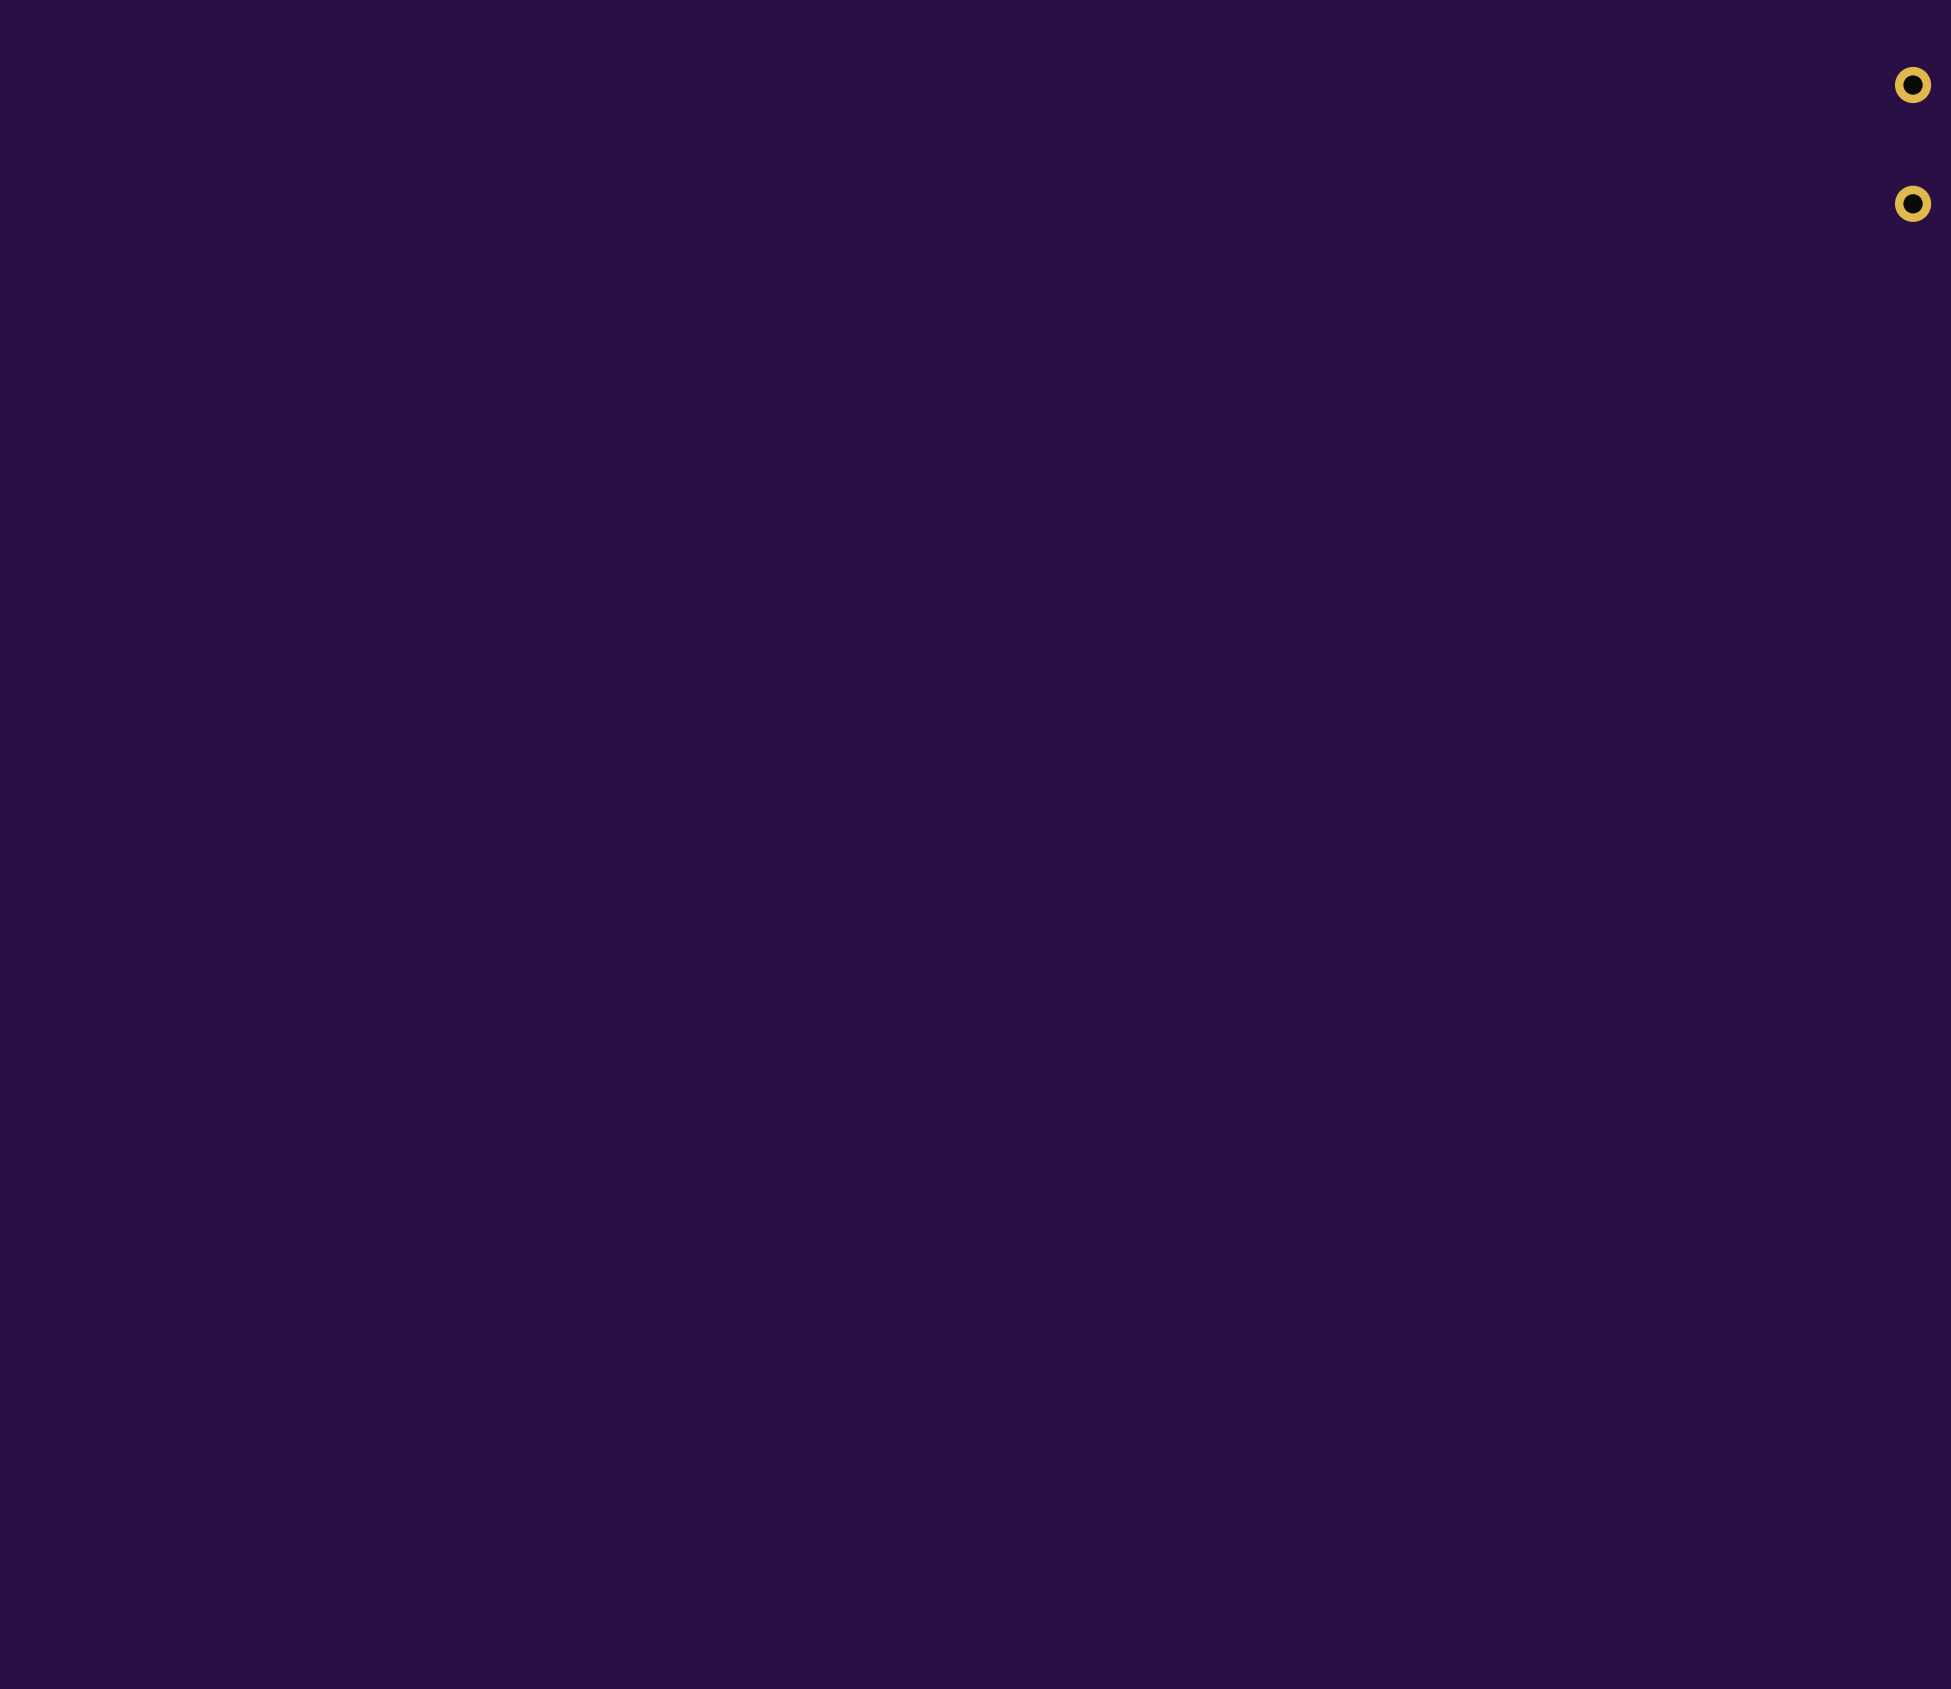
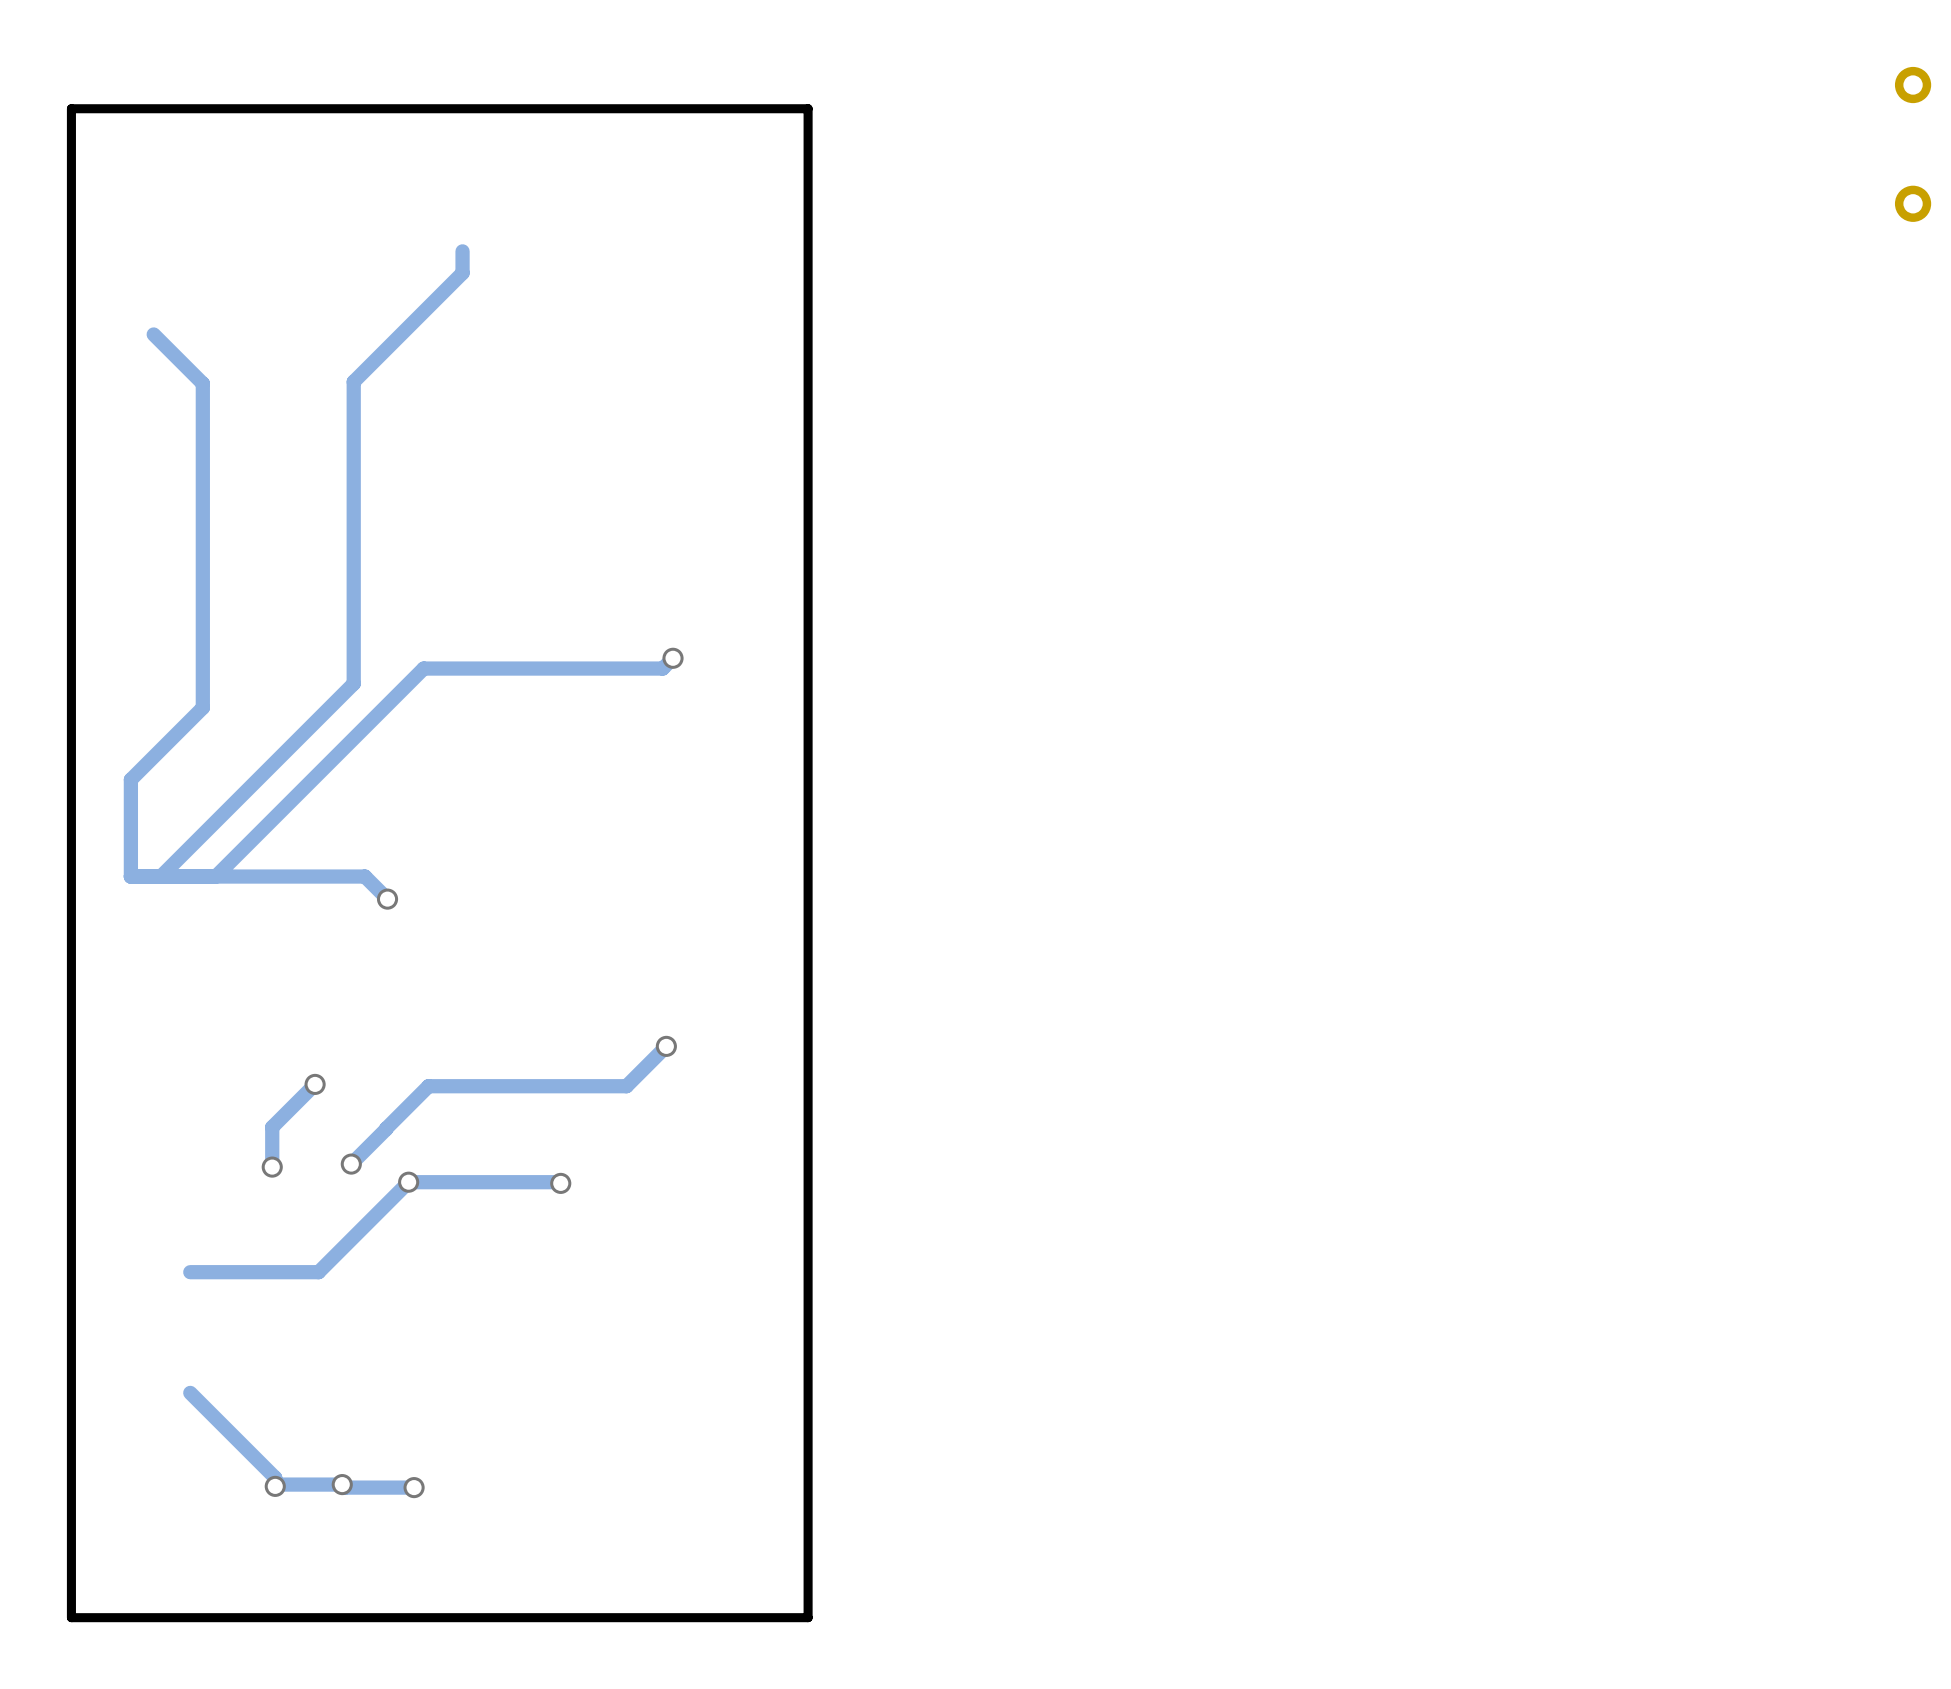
board edge: none -> (808, 108) (71, 108) (71, 1617) (808, 1617) (808, 108)
track: none -> (462, 251) (462, 273) (353, 381) (353, 683) (160, 876)
track: none -> (153, 334) (202, 383) (202, 707) (130, 779) (130, 876) (364, 876) (387, 899)
track: none -> (673, 658) (662, 668) (423, 668) (215, 876)
via: none -> (673, 658)
via: none -> (387, 899)
track: none -> (666, 1046) (626, 1086) (428, 1086) (351, 1164)
via: none -> (666, 1046)
track: none -> (315, 1084) (272, 1127) (272, 1167)
via: none -> (315, 1084)
via: none -> (351, 1164)
via: none -> (272, 1167)
via: none -> (408, 1182)
track: none -> (560, 1183) (408, 1182) (318, 1272) (190, 1272)
via: none -> (560, 1183)
track: none -> (190, 1392) (275, 1477) (275, 1486) (277, 1484) (342, 1484) (345, 1487) (414, 1487)
via: none -> (342, 1484)
via: none -> (275, 1486)
via: none -> (414, 1487)

